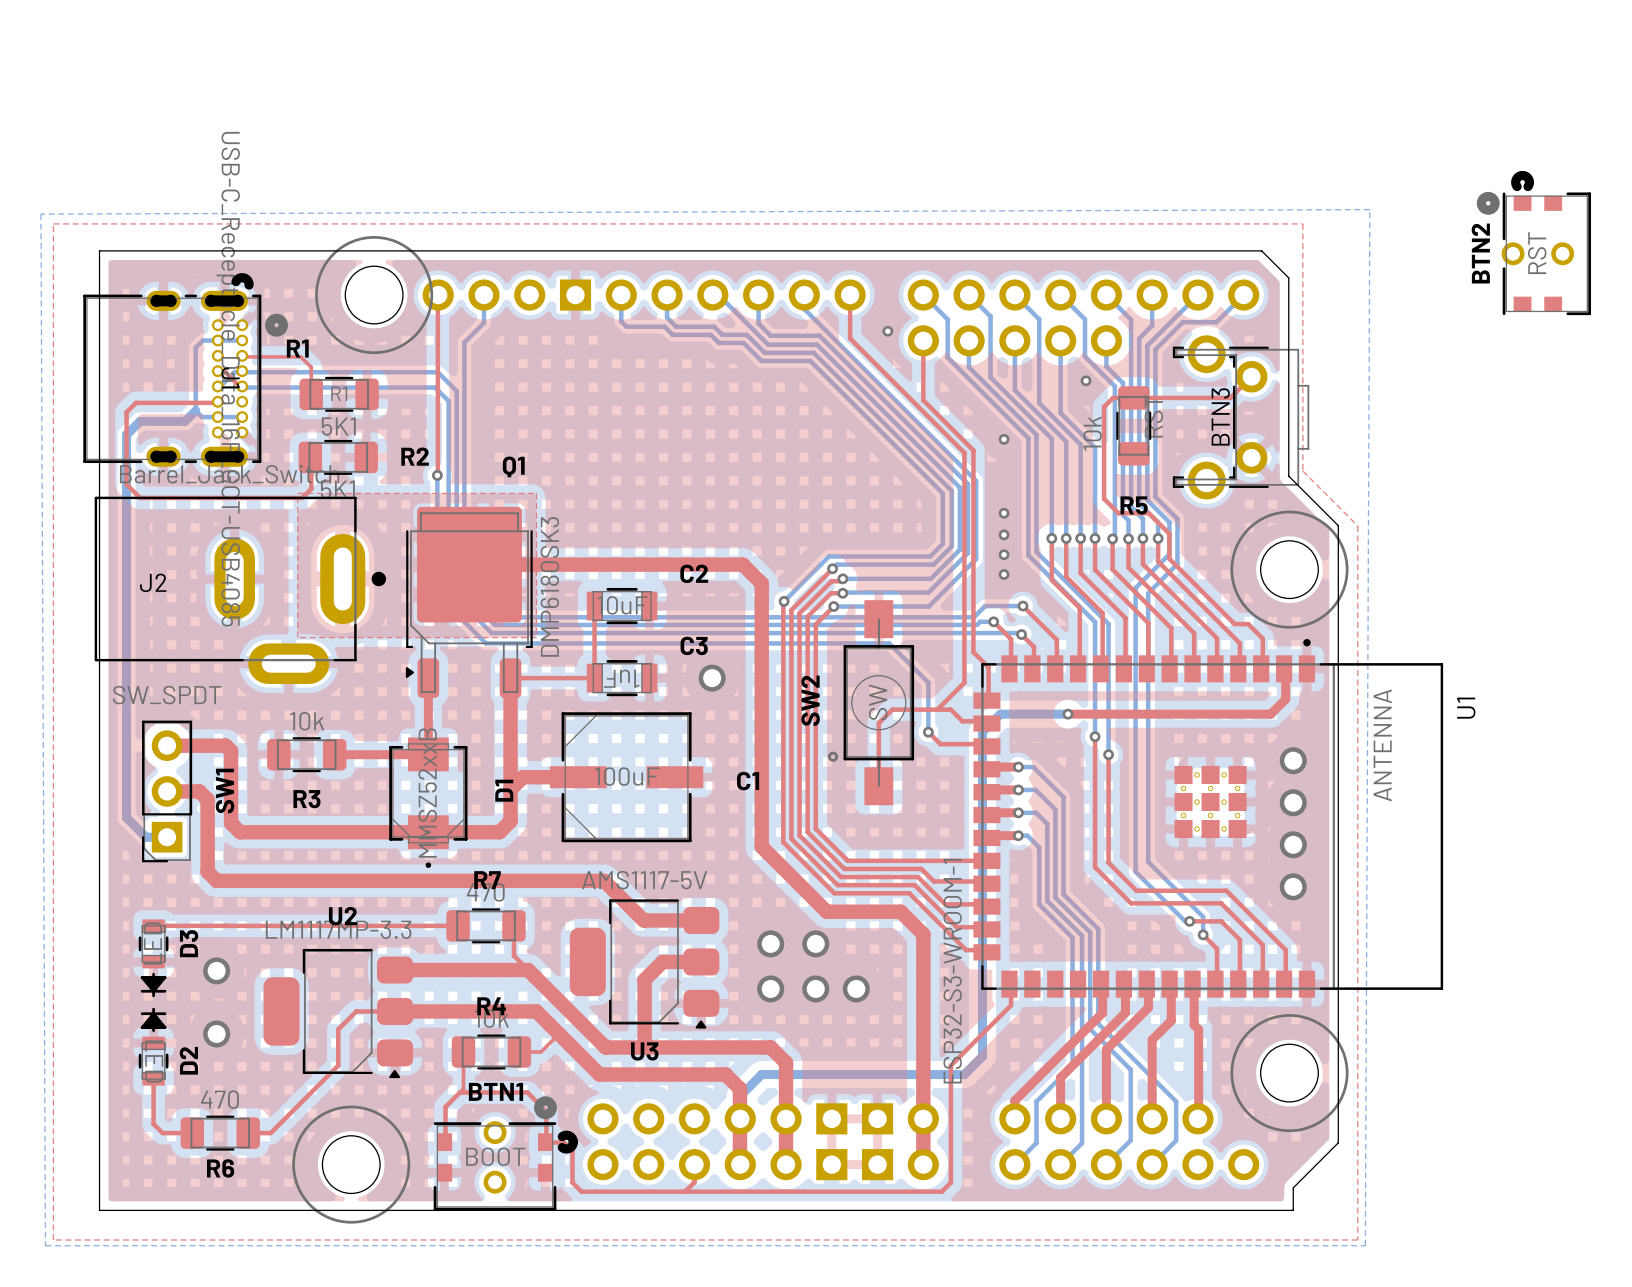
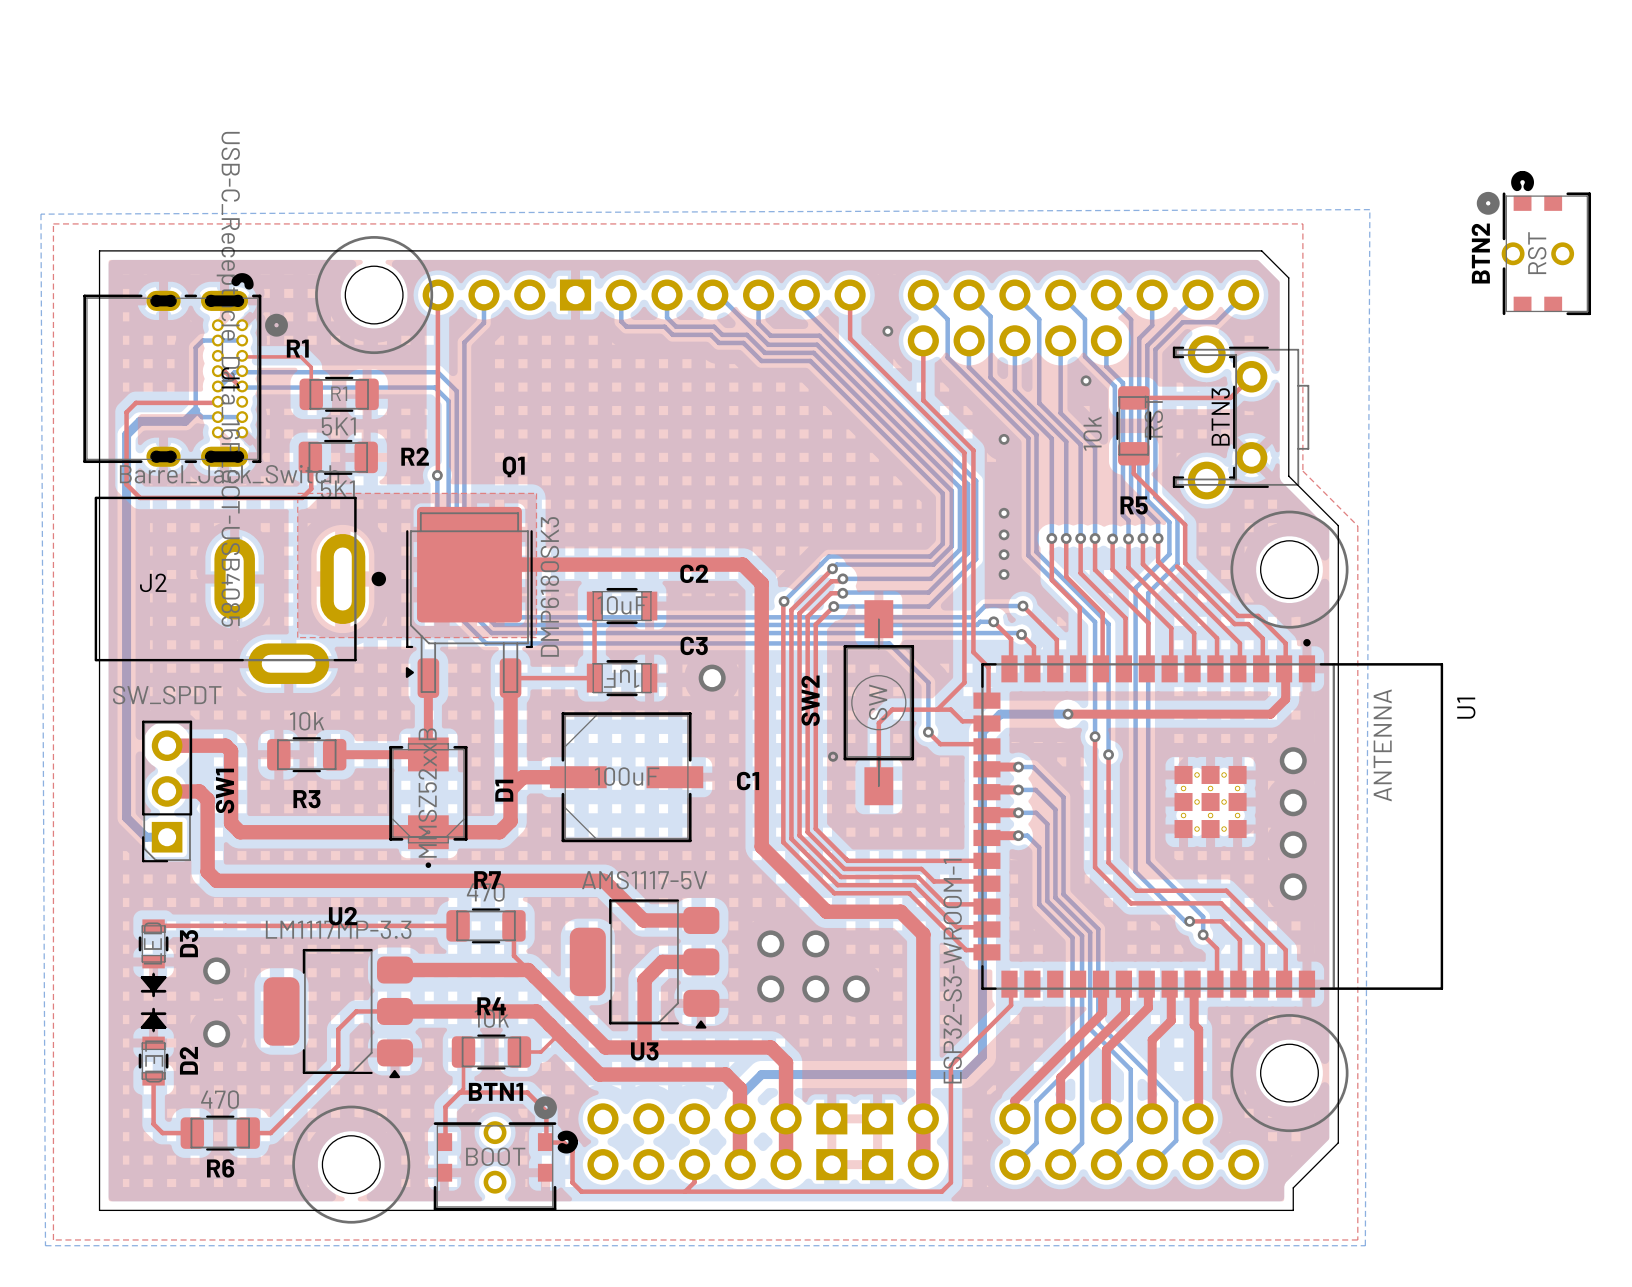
top track: (1133, 397) (1113, 397) (1104, 406) (1104, 498) (1118, 513) (1148, 513) (1169, 533) (1169, 558) (1177, 566) -> none
top track: none -> (1133, 453) (1133, 473) (1185, 524) (1185, 563) (1238, 615) (1258, 615) (1285, 643) (1285, 666)

